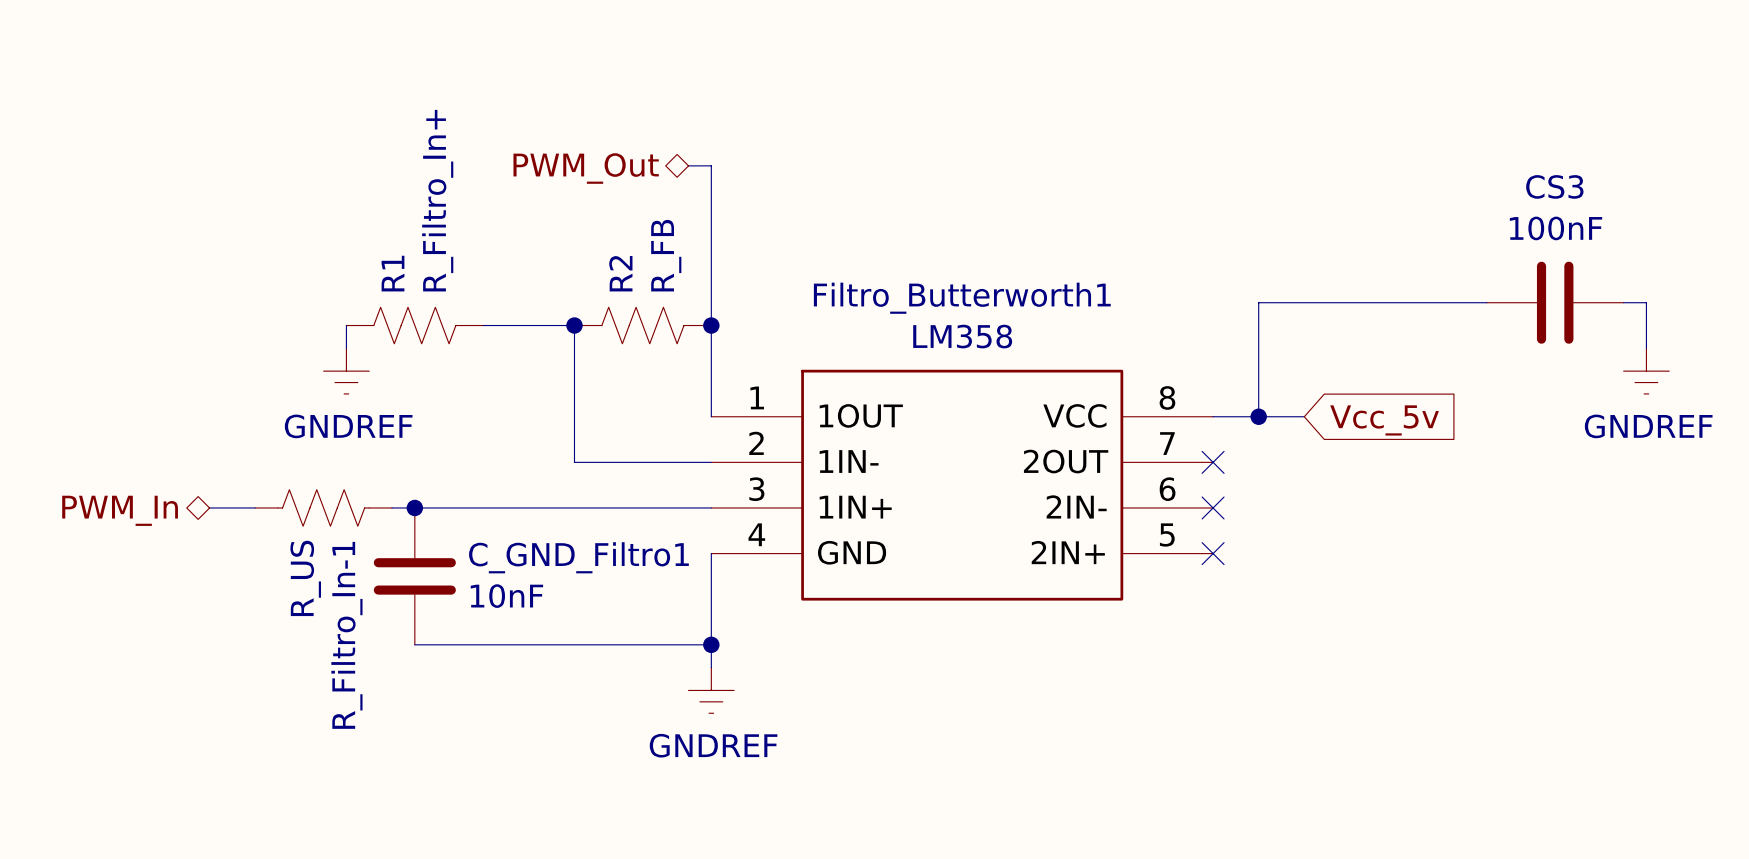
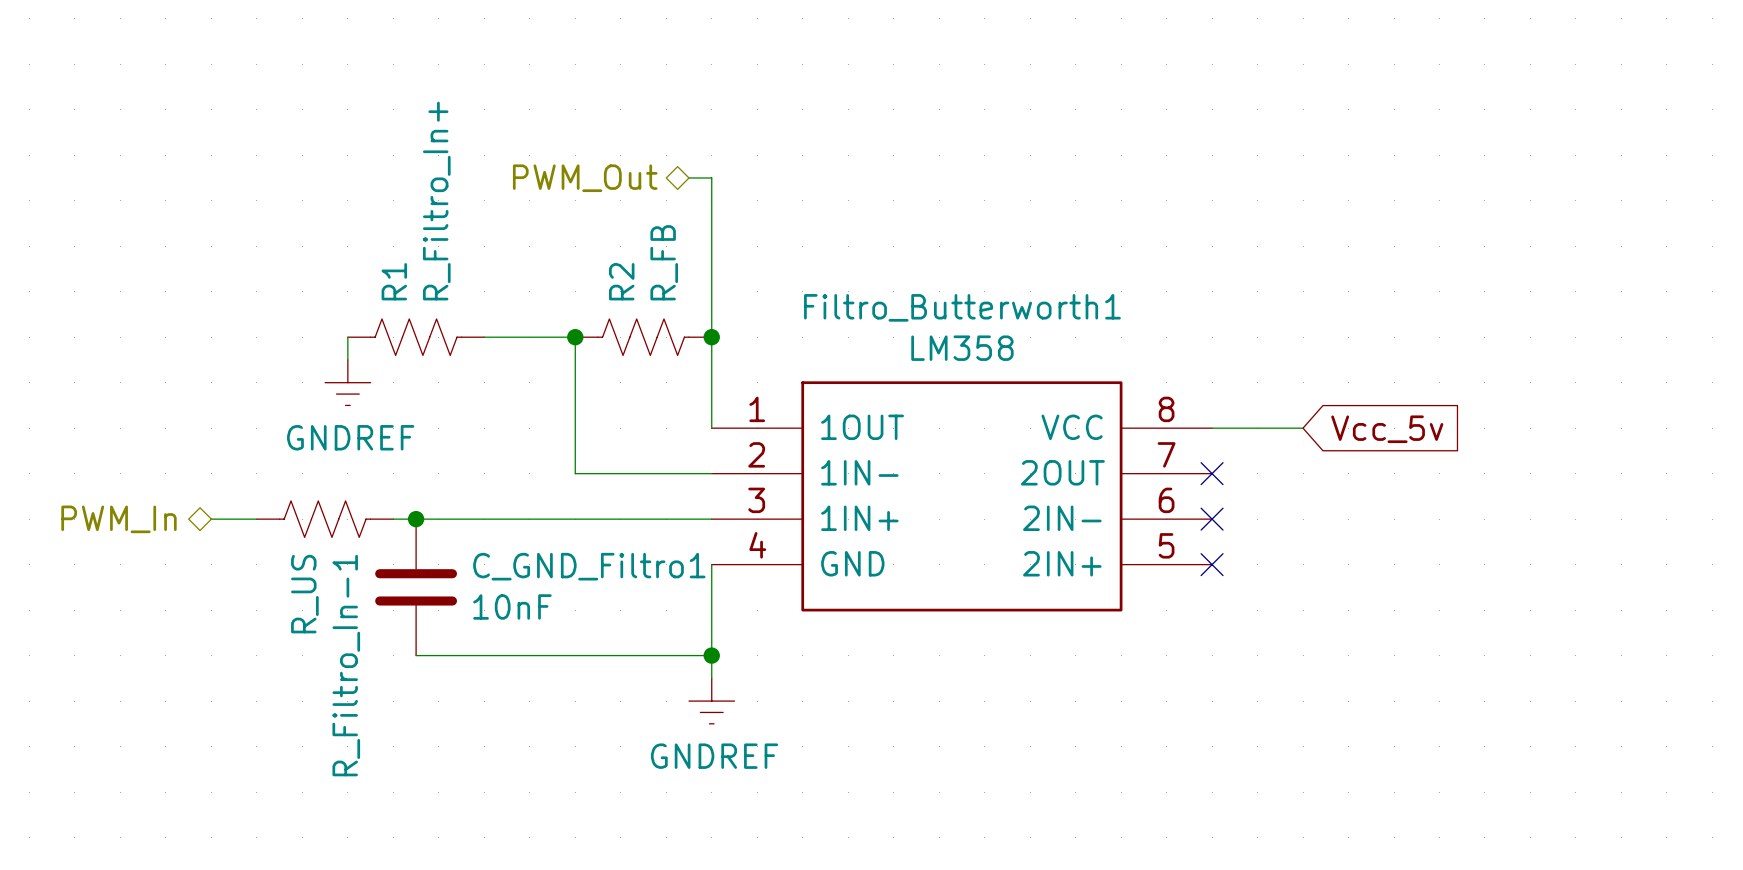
wire: (1486, 302) (1258, 302) (1258, 416) -> none
CS3: 100nF (1555, 302) -> none
wire: (1623, 302) (1646, 302) (1646, 348) -> none
power symbol: GNDREF (1646, 371) -> none
junction: (1258, 416) -> none

